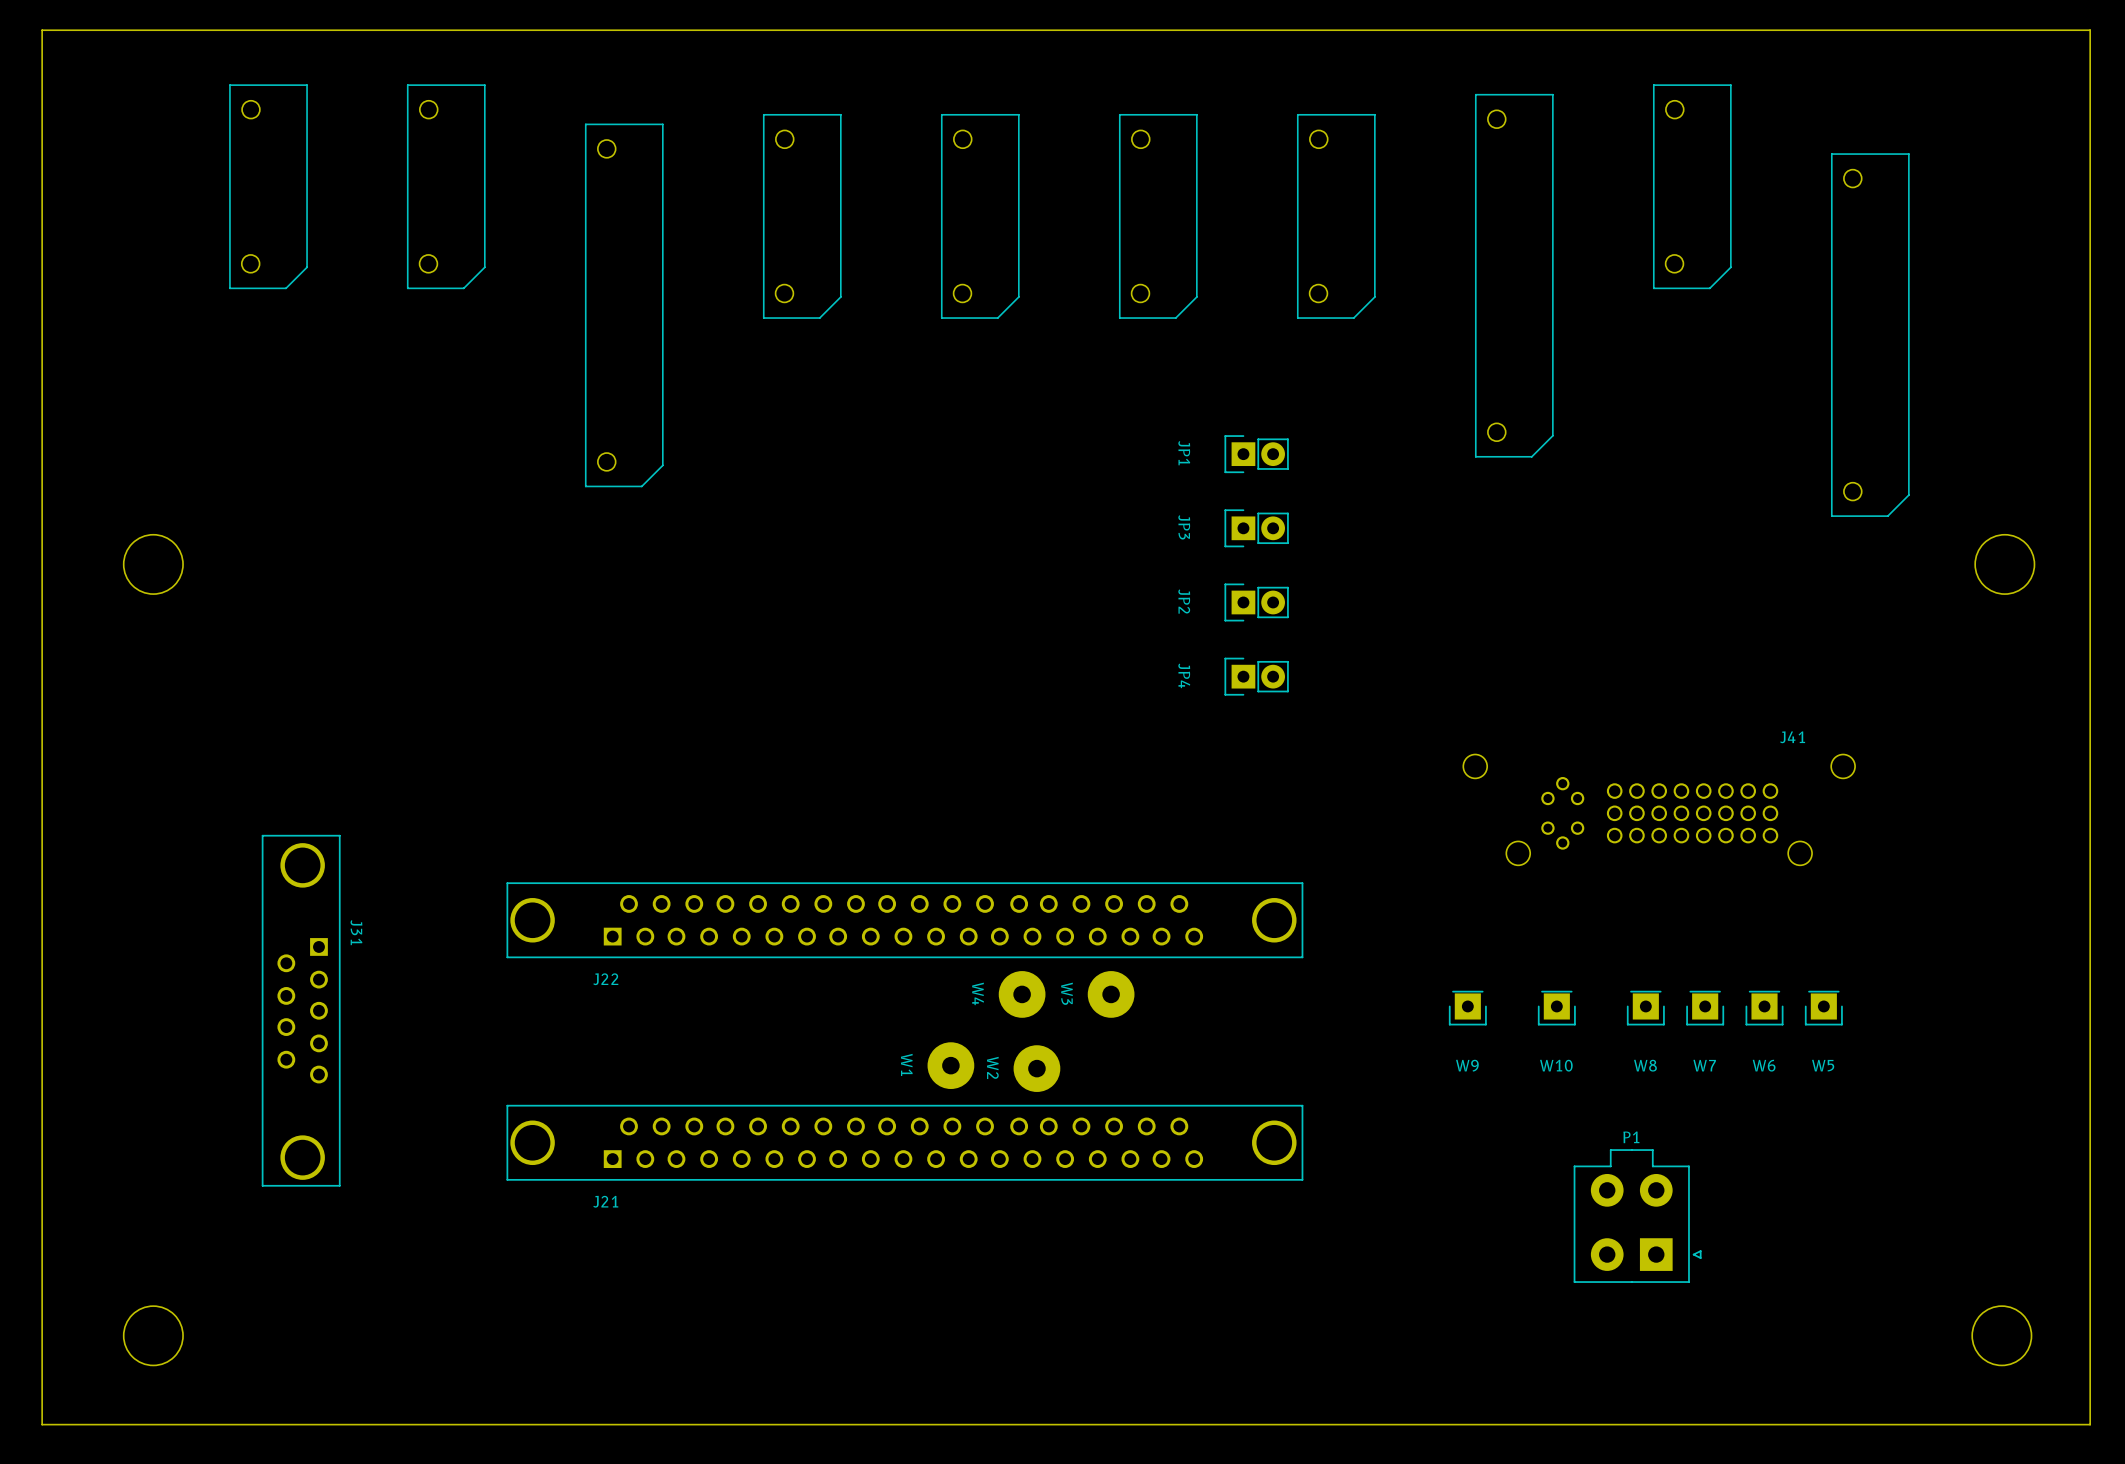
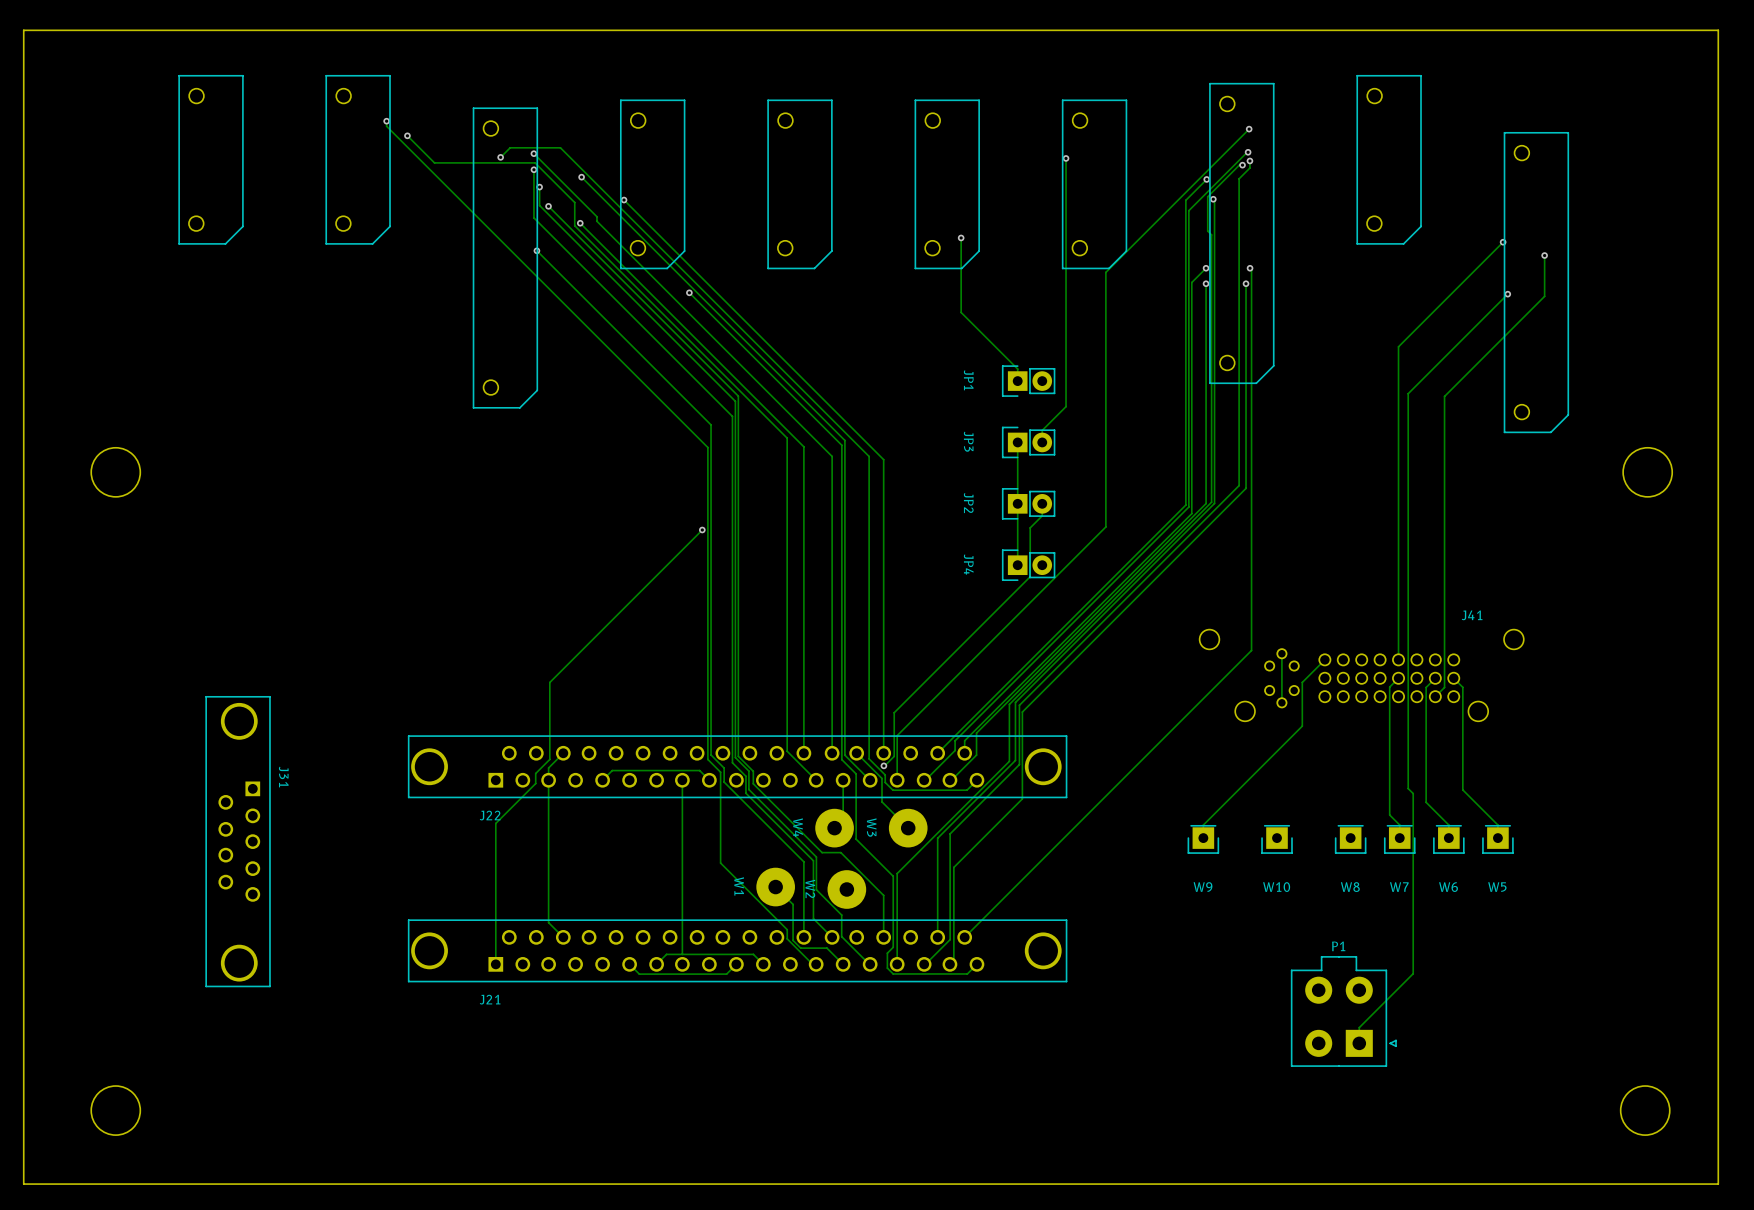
track: none -> (386, 121) (386, 126) (707, 447) (707, 759) (720, 772) (720, 863) (787, 929) (787, 938) (812, 964) (816, 964)
via: none -> (386, 121)
track: none -> (1249, 129) (1105, 272) (1105, 526) (897, 735) (897, 780)
via: none -> (1249, 129)
track: none -> (407, 135) (434, 162) (535, 162) (574, 202) (574, 225) (787, 438) (787, 751) (816, 780)
via: none -> (407, 135)
track: none -> (1248, 152) (1188, 210) (1188, 507) (955, 740) (955, 750) (924, 780)
via: none -> (1248, 152)
track: none -> (533, 153) (596, 216) (596, 221) (832, 456) (832, 753)
via: none -> (533, 153)
track: none -> (500, 157) (510, 147) (560, 147) (869, 456) (869, 758) (885, 775) (885, 782) (892, 790) (967, 790) (976, 780)
via: none -> (500, 157)
track: none -> (1066, 158) (1066, 406) (1042, 430) (1042, 442)
via: none -> (1066, 158)
track: none -> (1249, 160) (1249, 168) (1239, 178) (1239, 485) (1019, 705) (1019, 764) (950, 833) (950, 939) (924, 964)
via: none -> (1249, 160)
track: none -> (1242, 165) (1239, 165) (1207, 196) (1207, 231) (1211, 234) (1211, 502) (1009, 704) (1009, 761) (897, 873) (897, 964)
via: none -> (1242, 165)
track: none -> (533, 169) (533, 217) (732, 416) (732, 762) (745, 776) (745, 793) (813, 860) (813, 918) (832, 937)
via: none -> (533, 169)
track: none -> (581, 177) (844, 440) (844, 755) (870, 780)
via: none -> (581, 177)
track: none -> (1206, 179) (1185, 200) (1185, 505) (937, 753)
via: none -> (1206, 179)
track: none -> (539, 187) (539, 205) (735, 401) (735, 757) (748, 771) (748, 789) (816, 857) (816, 889) (841, 915) (841, 936) (870, 964)
via: none -> (539, 187)
track: none -> (1213, 199) (1214, 503) (1015, 702) (1015, 760) (937, 838) (937, 937)
via: none -> (1213, 199)
track: none -> (624, 200) (883, 459) (883, 753)
via: none -> (624, 200)
track: none -> (548, 206) (738, 396) (738, 756) (753, 771) (753, 783) (822, 852) (840, 852) (883, 895) (883, 937)
via: none -> (548, 206)
track: none -> (580, 223) (803, 446) (803, 753)
via: none -> (580, 223)
track: none -> (961, 237) (961, 312) (1017, 369) (1017, 381)
via: none -> (961, 237)
track: none -> (1503, 242) (1398, 346) (1398, 659)
via: none -> (1503, 242)
track: none -> (536, 250) (711, 424) (711, 754) (724, 768) (724, 782) (803, 861) (803, 937)
via: none -> (536, 250)
track: none -> (1544, 255) (1544, 296) (1444, 396) (1444, 687) (1435, 696)
via: none -> (1544, 255)
track: none -> (1206, 268) (1191, 282) (1191, 513) (964, 740) (964, 753)
via: none -> (1206, 268)
track: none -> (1250, 268) (1251, 650) (964, 937)
via: none -> (1250, 268)
track: none -> (1206, 283) (1206, 503) (976, 733) (976, 755) (949, 780)
via: none -> (1206, 283)
track: none -> (1246, 283) (1246, 488) (1022, 712) (1022, 798) (953, 867) (953, 960) (949, 964)
via: none -> (1246, 283)
track: none -> (689, 292) (841, 445) (841, 759) (856, 773) (856, 839) (893, 876) (893, 947) (887, 953) (887, 968) (893, 973) (967, 973) (976, 964)
via: none -> (689, 292)
track: none -> (1507, 294) (1408, 393) (1408, 788) (1413, 793) (1413, 973) (1359, 1027) (1359, 1043)
via: none -> (1507, 294)
track: none -> (1017, 442) (1017, 565)
track: none -> (1042, 503) (1042, 515) (1030, 527) (1030, 576) (894, 712) (894, 756) (883, 765)
track: none -> (702, 529) (549, 682) (549, 759) (535, 773) (535, 783) (495, 823) (495, 964)
via: none -> (702, 529)
track: none -> (1281, 653) (1281, 702)
track: none -> (1324, 659) (1302, 682) (1302, 726) (1203, 825) (1203, 838)
track: none -> (1398, 678) (1389, 687) (1389, 815) (1399, 825) (1399, 838)
track: none -> (1435, 678) (1426, 687) (1426, 802) (1448, 825) (1448, 838)
track: none -> (1453, 678) (1462, 687) (1462, 789) (1497, 825) (1497, 838)
track: none -> (563, 753) (548, 767) (548, 922) (563, 937)
track: none -> (856, 753) (882, 778) (882, 801) (908, 828)
via: none -> (883, 765)
track: none -> (682, 780) (682, 954)
track: none -> (709, 780) (699, 770) (612, 770) (602, 780)
track: none -> (843, 780) (843, 819) (834, 828)
track: none -> (775, 887) (793, 904) (793, 940) (800, 948) (826, 948) (843, 964)
track: none -> (736, 964) (726, 974) (639, 974) (629, 964)
track: none -> (763, 964) (753, 954) (666, 954) (656, 964)

